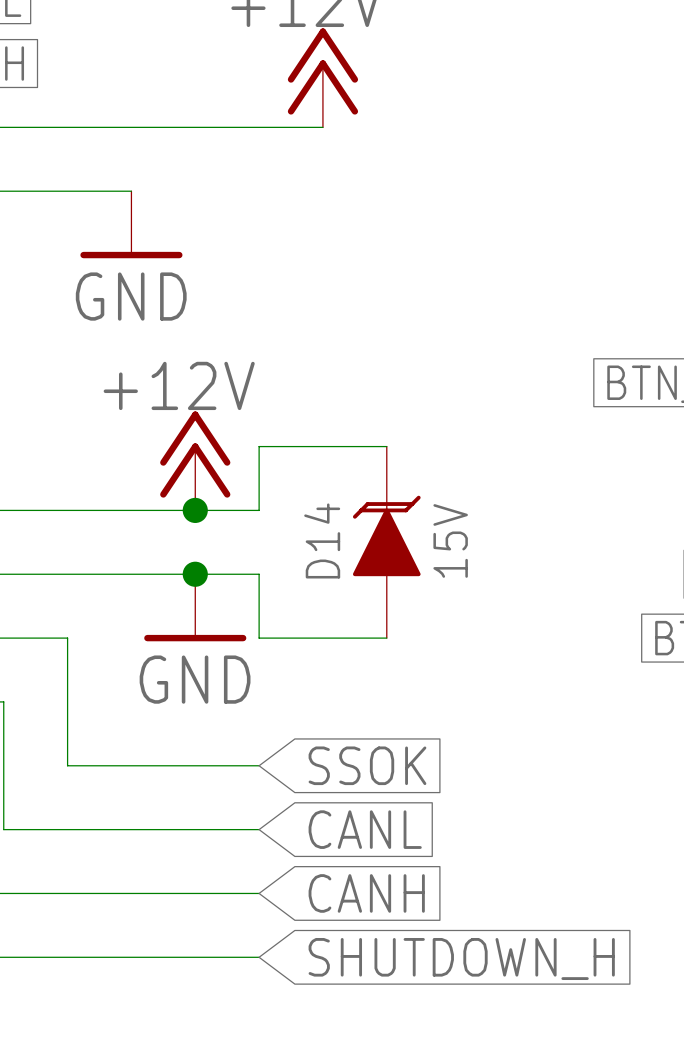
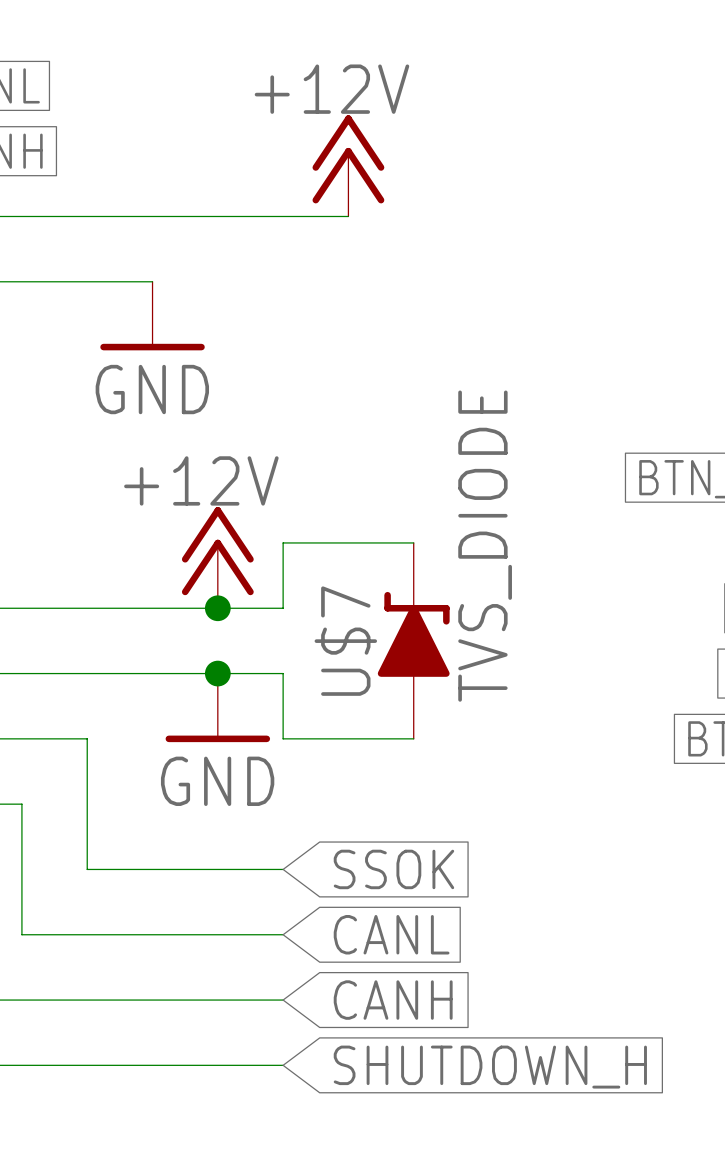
D14: (386, 542) -> none
U$7: none -> TVS_DIODE (413, 640)

